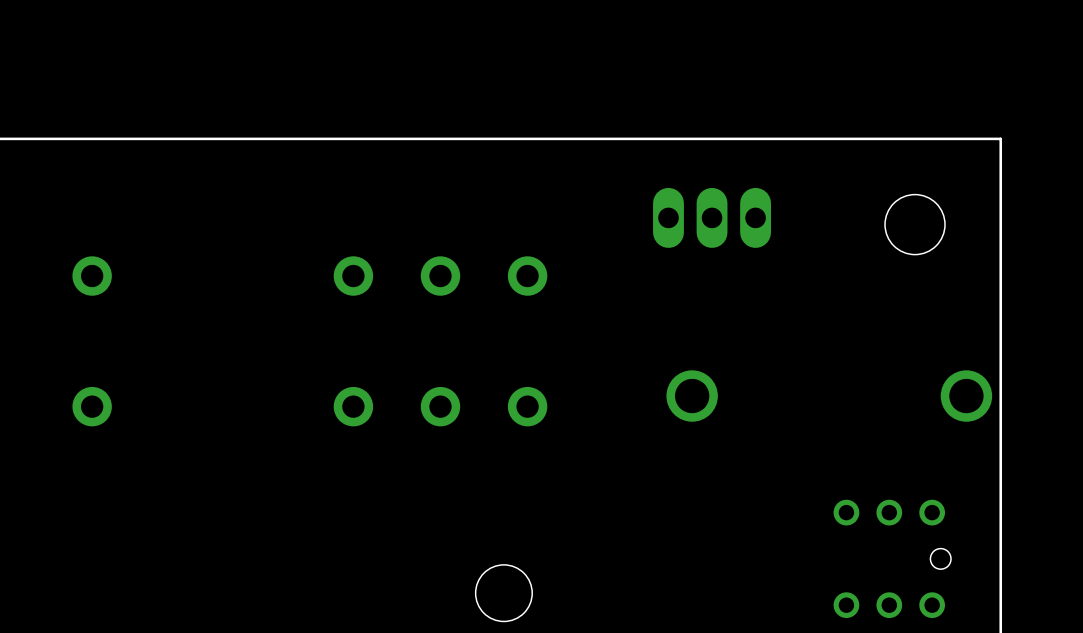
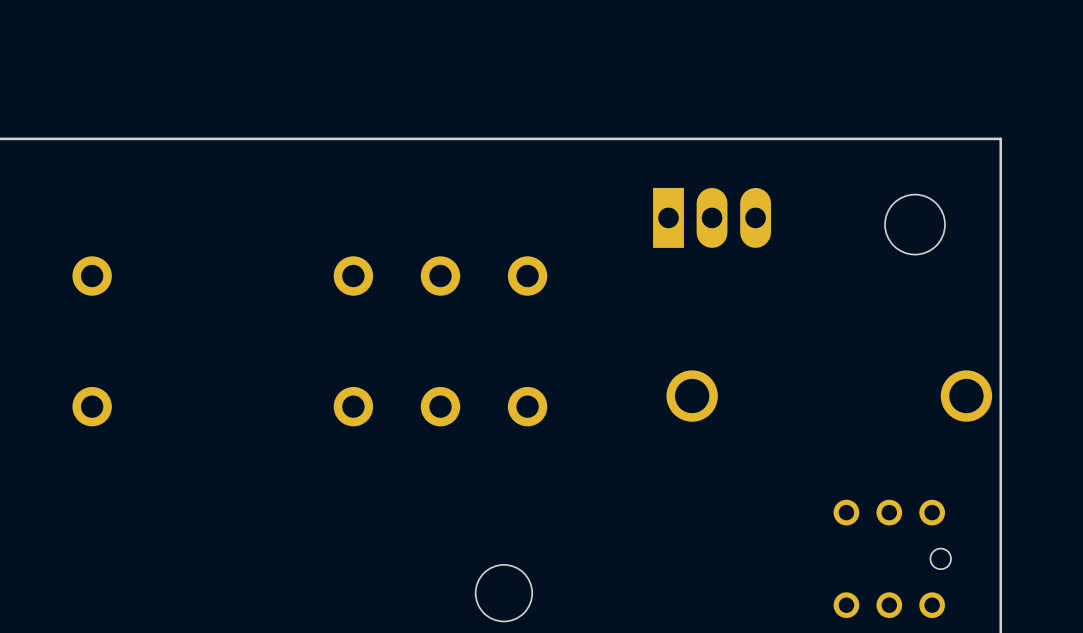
part footprint: [653, 187, 772, 248] -> [653, 187, 772, 248]

